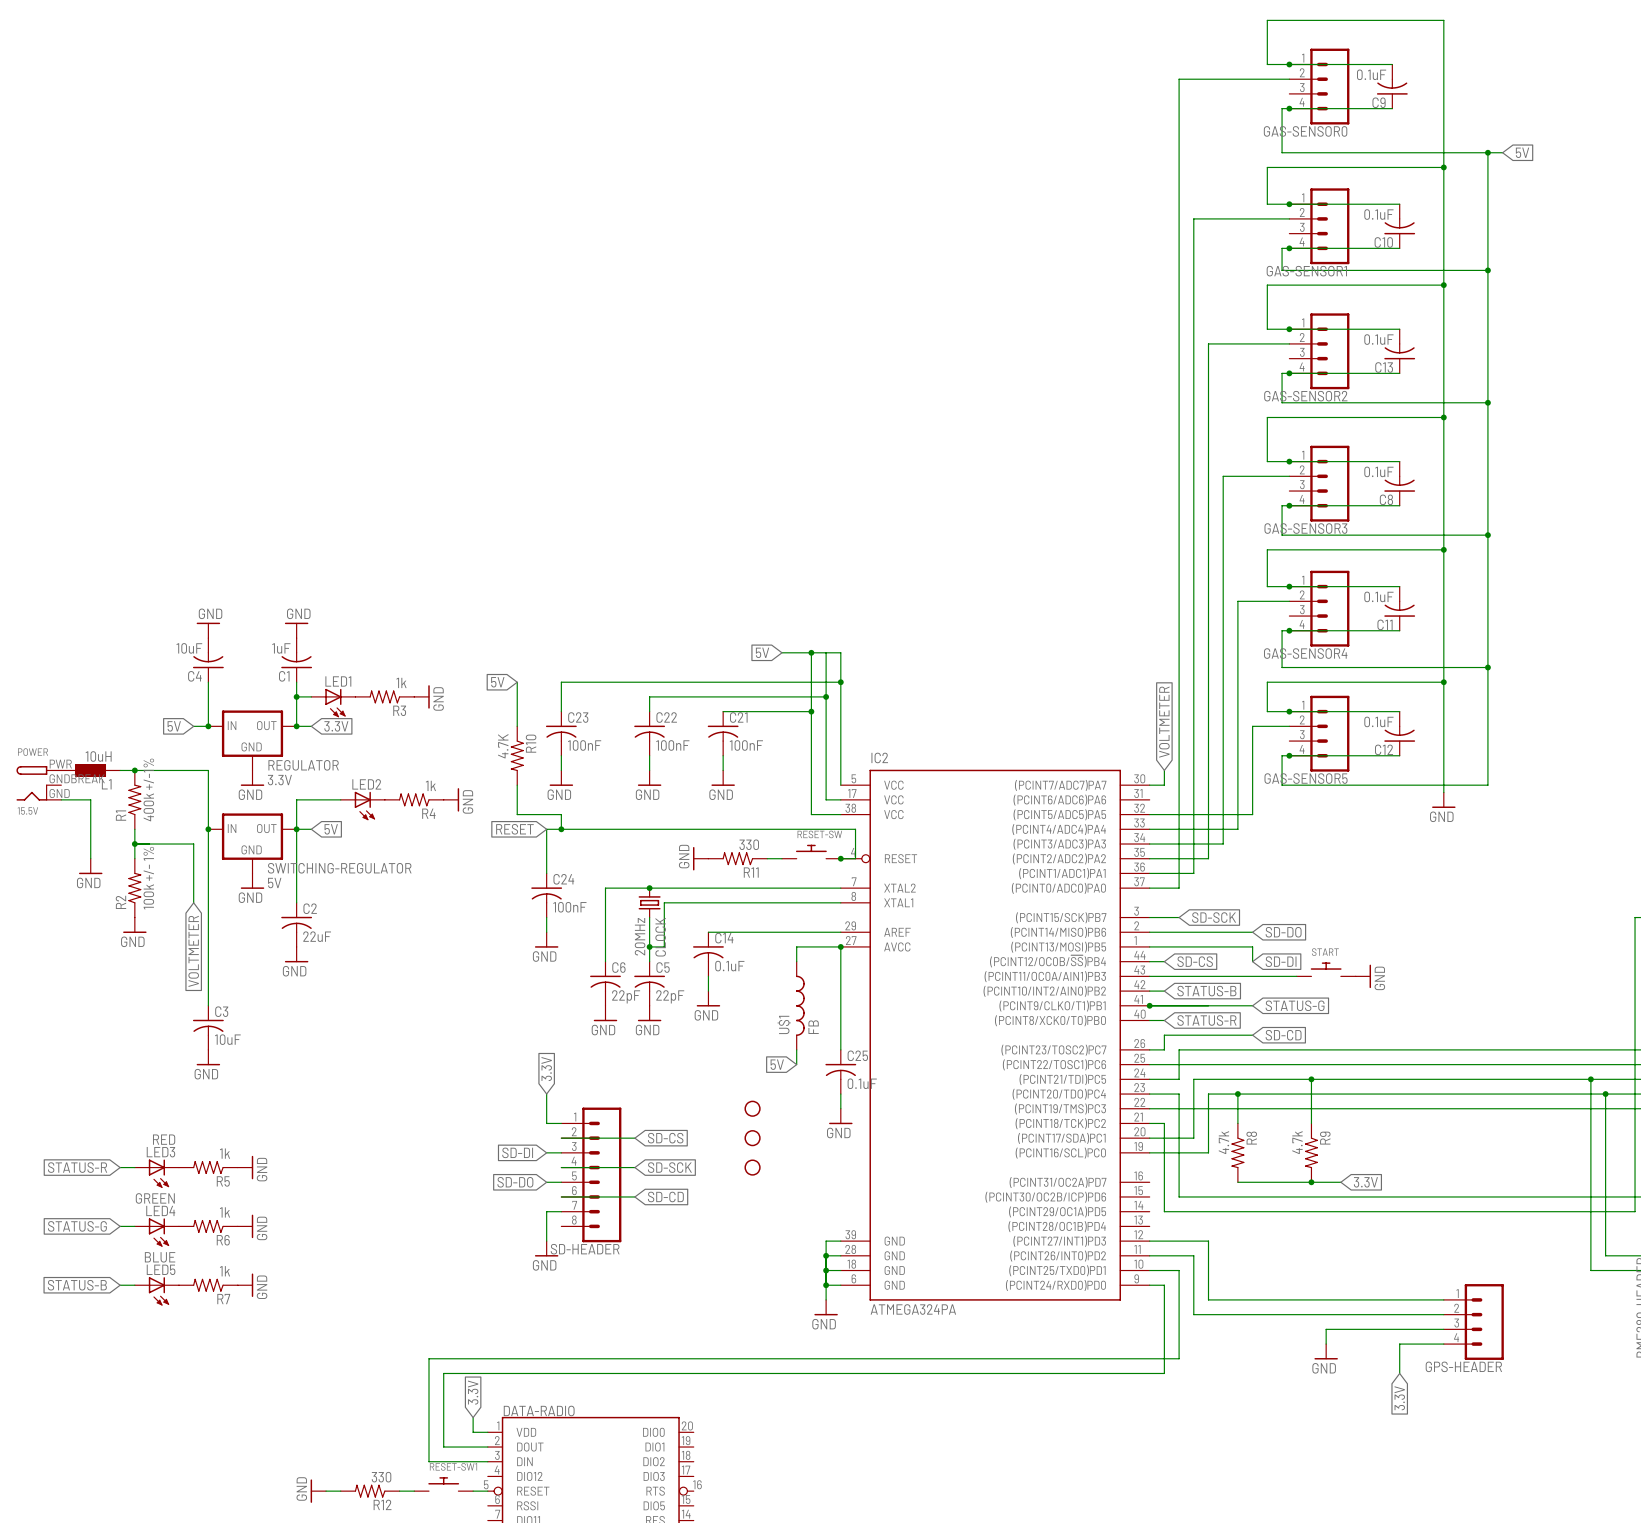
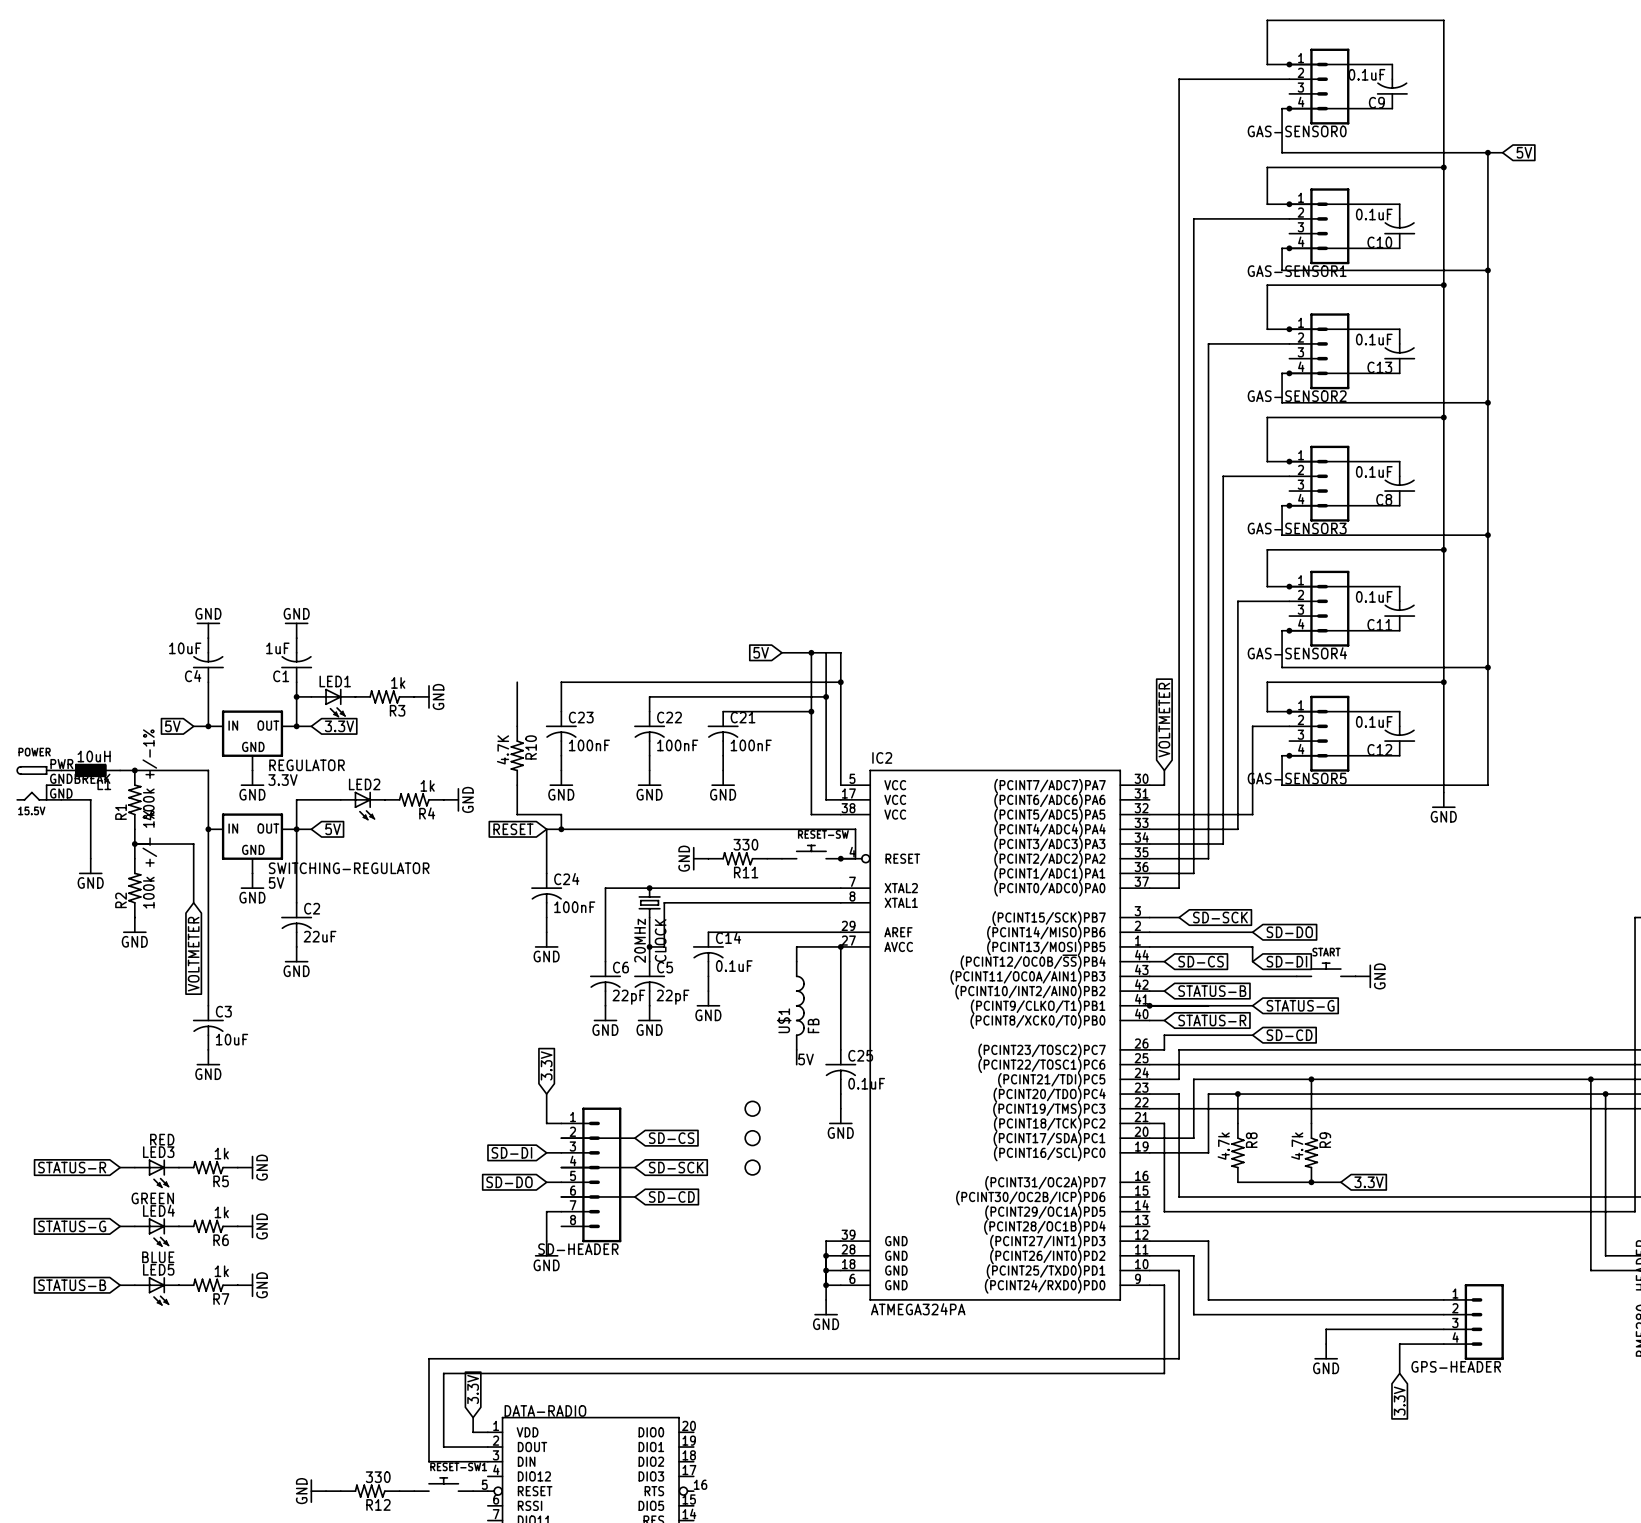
global label: 5V (497, 682) -> none
label: none -> 5V (806, 1059)
global label: 5V (777, 1064) -> none

